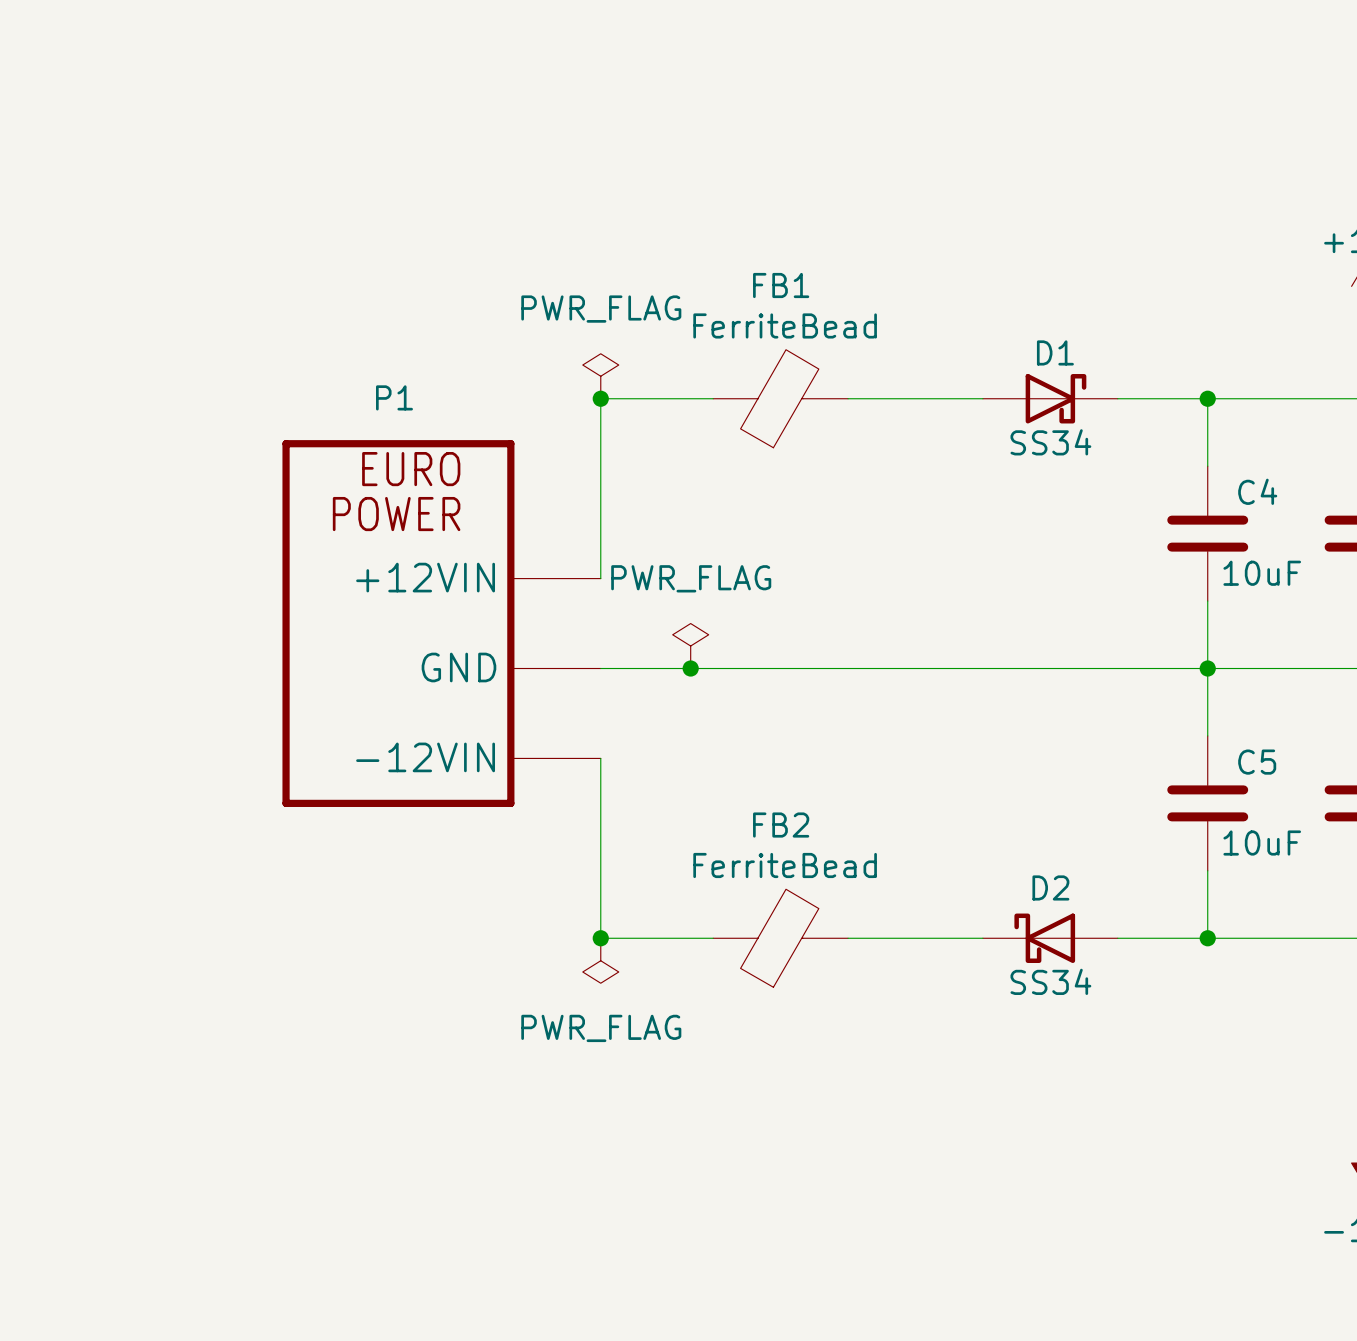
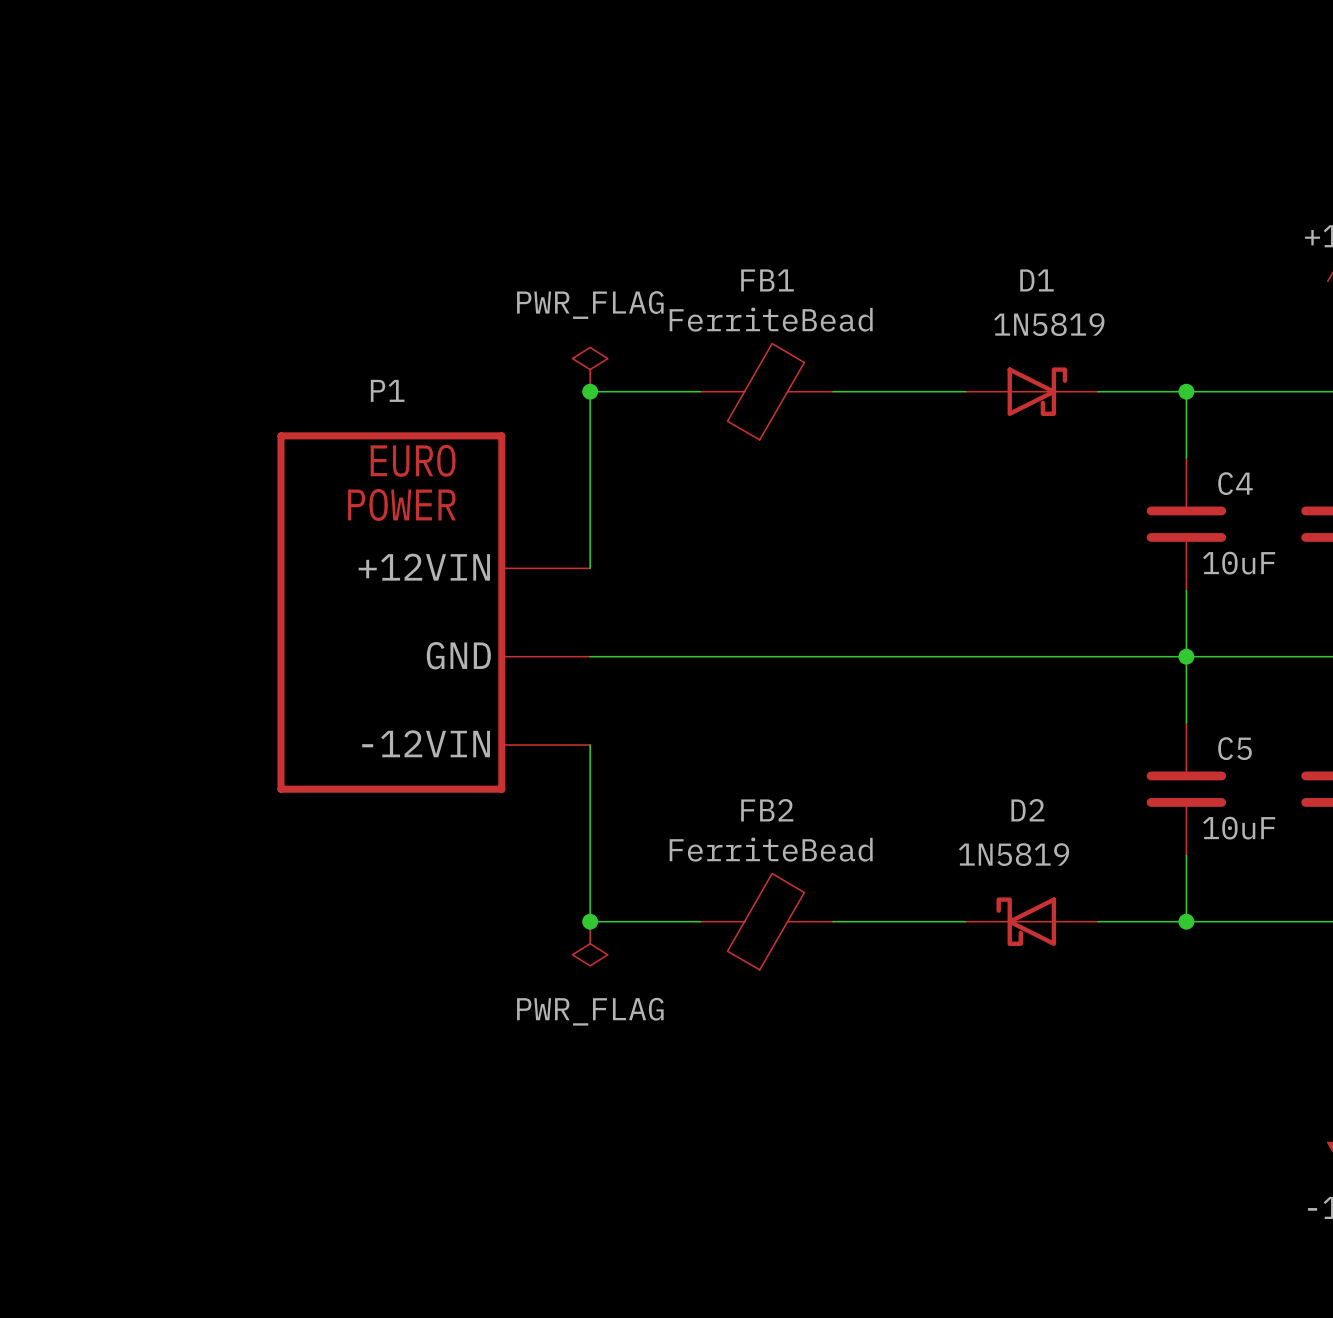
D1 name position: D1 (1055, 352) -> D1 (1037, 280)
D1 value: SS34 (1050, 442) -> 1N5819 (1049, 324)
power symbol: PWR_FLAG (690, 646) -> none
junction: (690, 668) -> none
D2 name position: D2 (1050, 887) -> D2 (1027, 810)
D2 value: SS34 (1050, 981) -> 1N5819 (1013, 854)

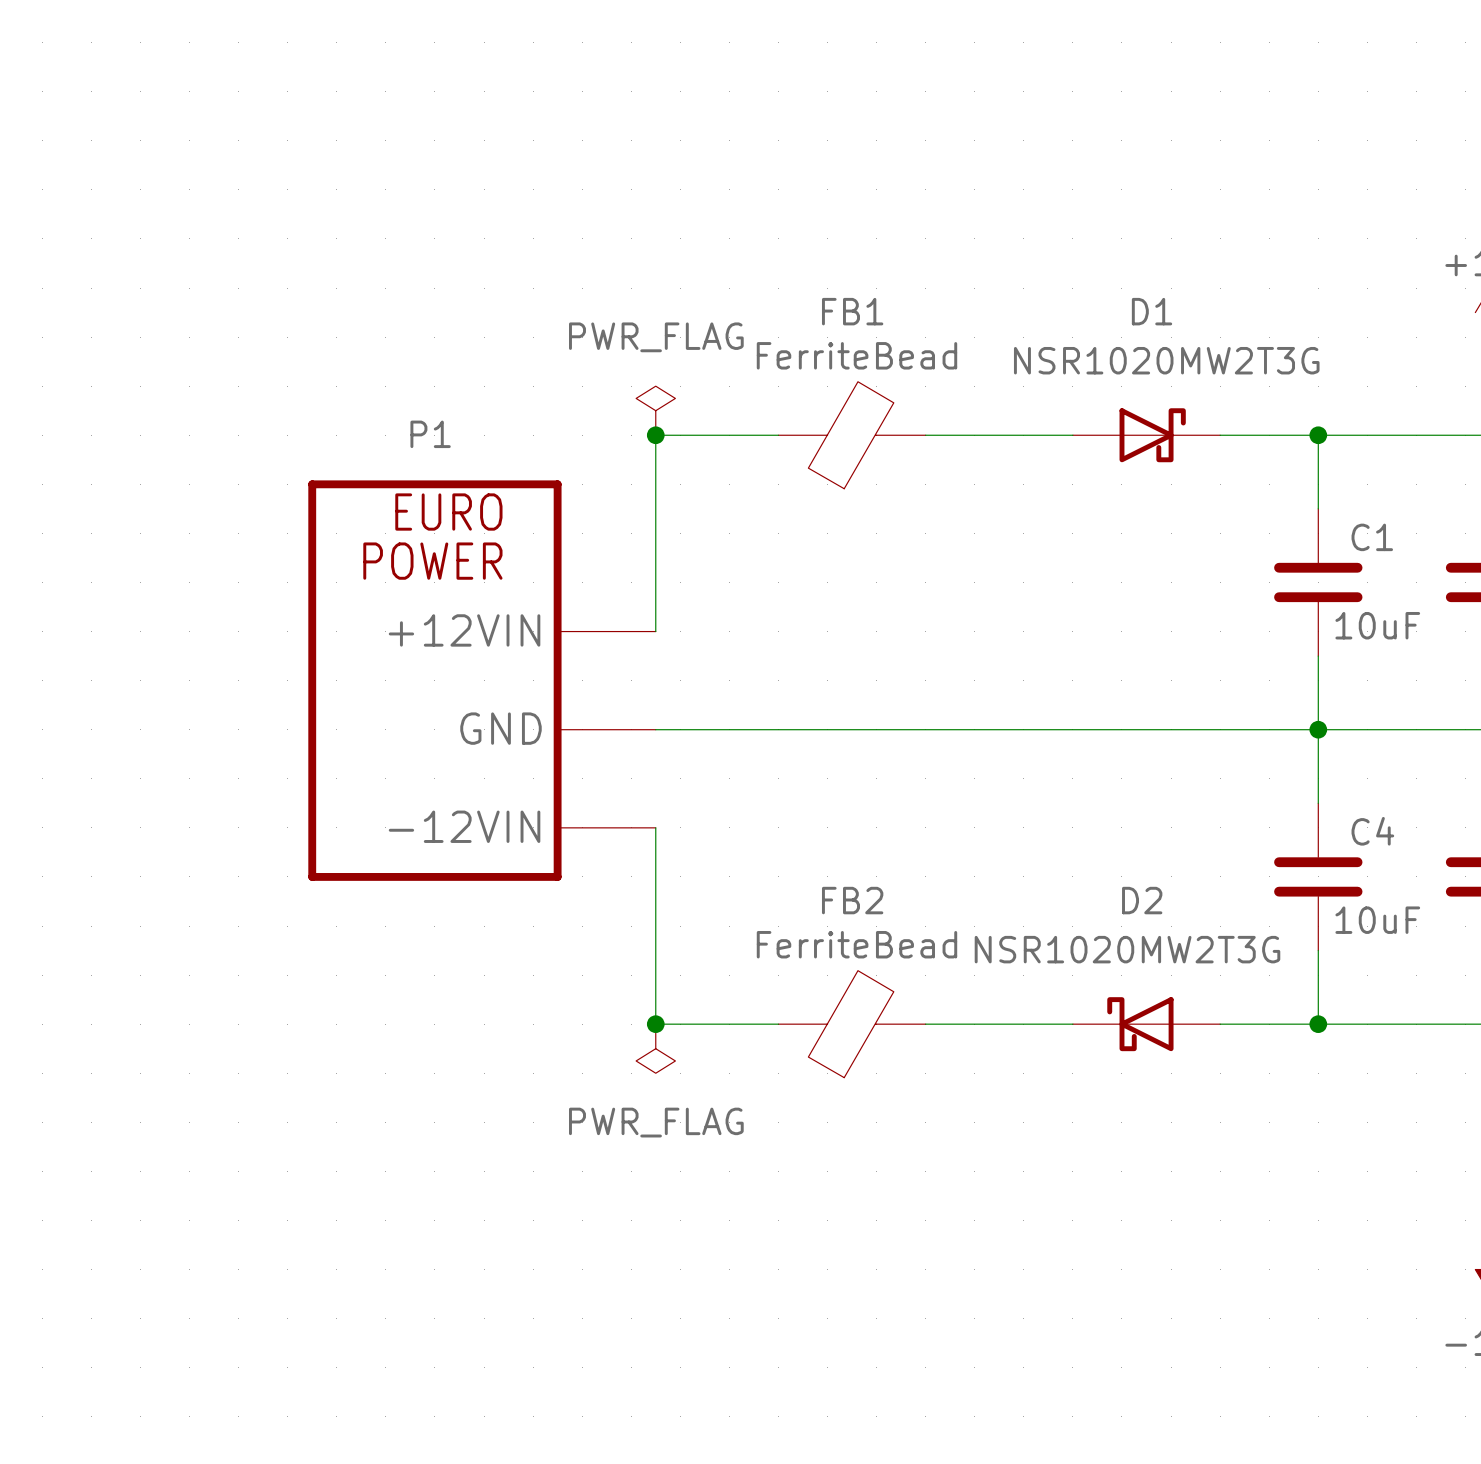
D1 value: 1N5819 (1049, 324) -> NSR1020MW2T3G (1166, 360)
C4 name: C4 (1235, 483) -> C1 (1372, 537)
C5 name: C5 (1235, 748) -> C4 (1372, 831)
D2 value: 1N5819 (1013, 854) -> NSR1020MW2T3G (1127, 949)

